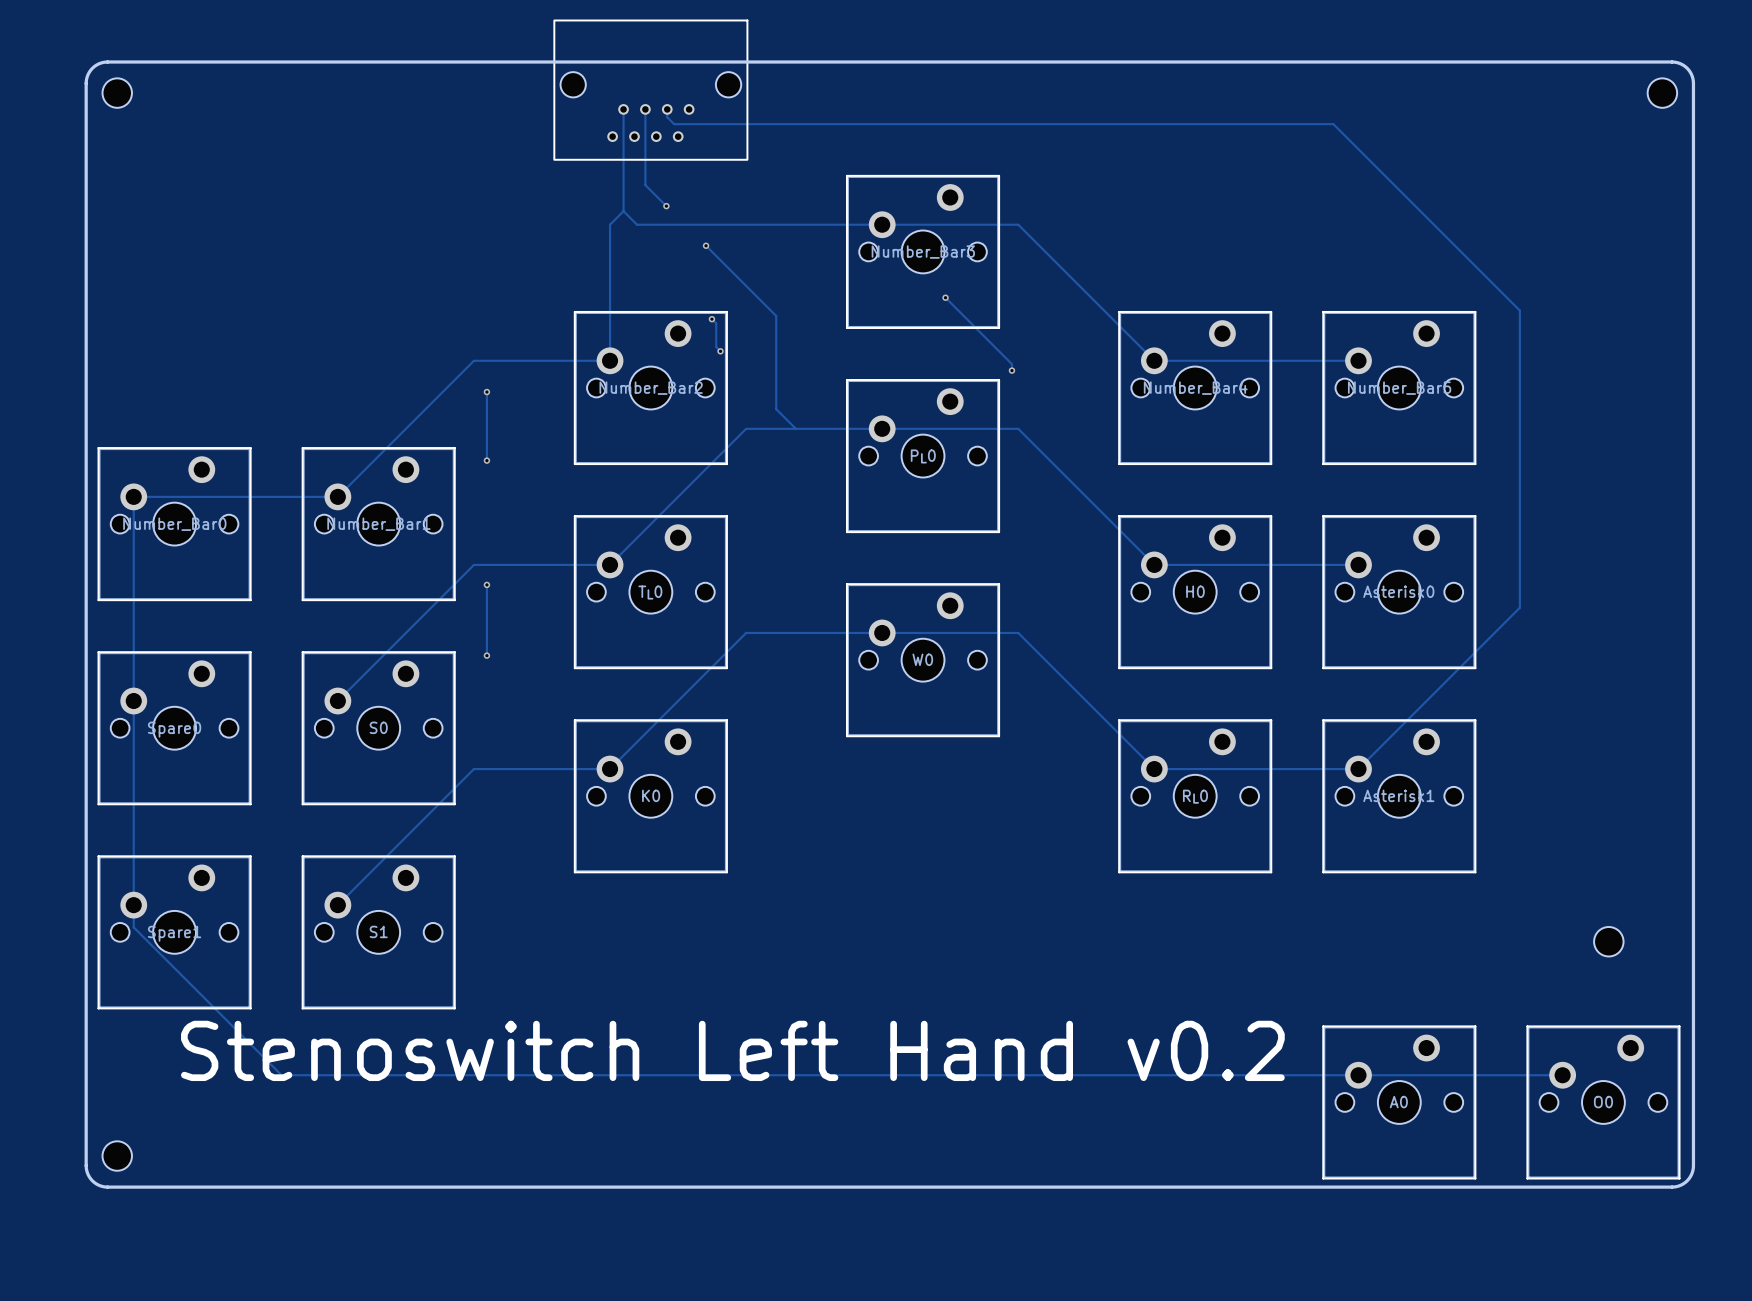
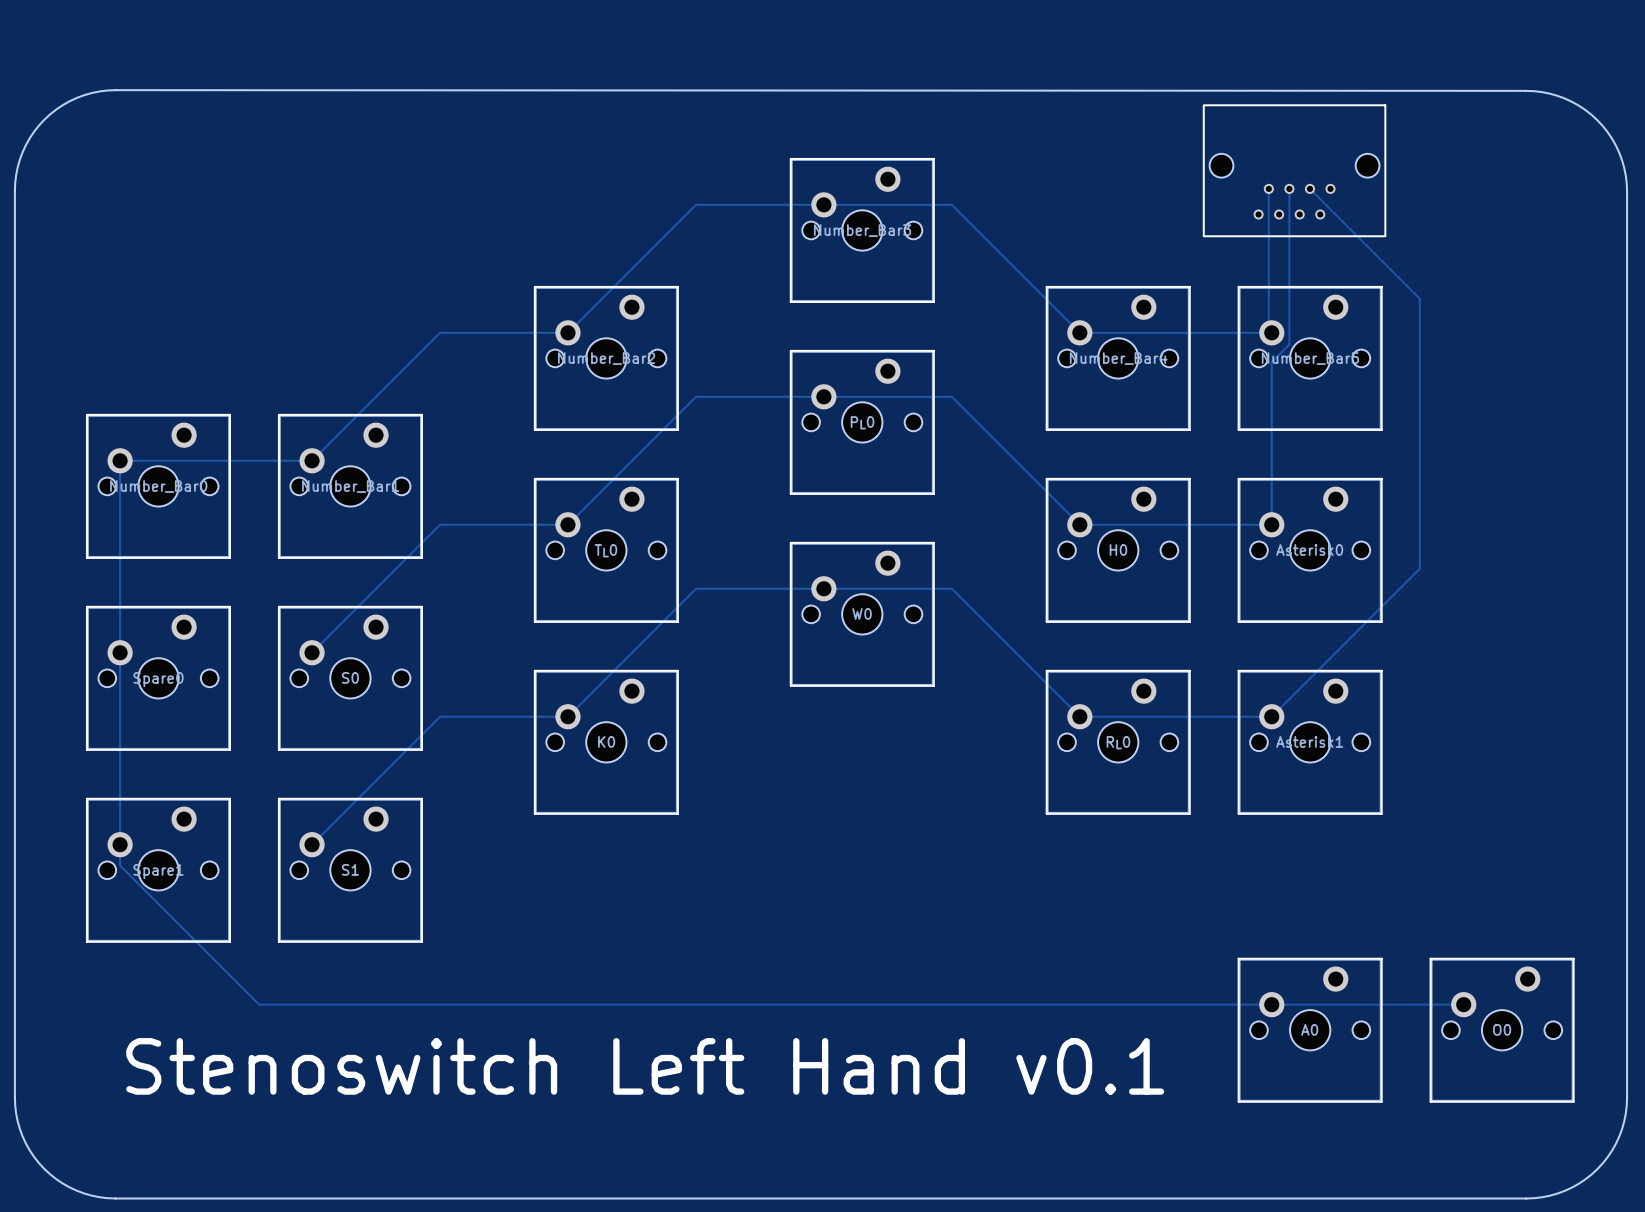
board edge: (107, 62) (1672, 62) (1683, 65) (1690, 72) (1693, 83) (1693, 1165) (1690, 1177) (1681, 1184) (1672, 1187) (107, 1187) (96, 1183) (88, 1174) (86, 1165) (86, 83) (88, 74) (92, 68) (98, 64) (107, 62) -> (115, 90) (92, 92) (77, 97) (50, 114) (39, 125) (25, 145) (19, 159) (15, 183) (15, 1105) (19, 1128) (29, 1150) (44, 1169) (56, 1179) (84, 1193) (115, 1198) (1526, 1198) (1549, 1195) (1572, 1187) (1591, 1174) (1607, 1156) (1622, 1128) (1627, 1097) (1627, 191) (1624, 168) (1615, 145) (1602, 125) (1585, 109) (1556, 95) (1525, 90) (115, 90)
part: (650, 90) -> none
part: (117, 93) -> none
part: (1662, 93) -> none
track: (623, 109) (623, 211) -> none
track: (645, 109) (645, 185) (666, 206) -> none
track: (667, 109) (667, 117) (674, 124) (1333, 124) (1519, 310) (1519, 607) (1515, 611) -> (1309, 188) (1419, 298) (1419, 568)
part: none -> (1294, 170)
via: (666, 206) -> none
track: none -> (1268, 188) (1268, 329)
track: none -> (1289, 188) (1289, 344) (1271, 362) (1271, 524)
track: (623, 211) (610, 224) (610, 360) -> (695, 204) (567, 332)
track: (623, 211) (637, 224) (746, 224) -> none
track: (706, 245) (776, 315) (776, 409) (795, 428) -> none
via: (706, 245) -> none
track: (945, 297) (1011, 364) (1011, 370) -> none
via: (945, 297) -> none
track: (711, 319) (716, 323) (716, 347) (720, 351) -> none
via: (711, 319) -> none
via: (720, 351) -> none
via: (1011, 370) -> none
track: (486, 392) (486, 460) -> none
via: (486, 392) -> none
via: (486, 460) -> none
track: (486, 584) (486, 655) -> none
via: (486, 584) -> none
via: (486, 655) -> none
part: (1608, 941) -> none
text: Stenoswitch Left Hand v0.2 (732, 1050) -> Stenoswitch Left Hand v0.1 (645, 1066)
part: (117, 1156) -> none

